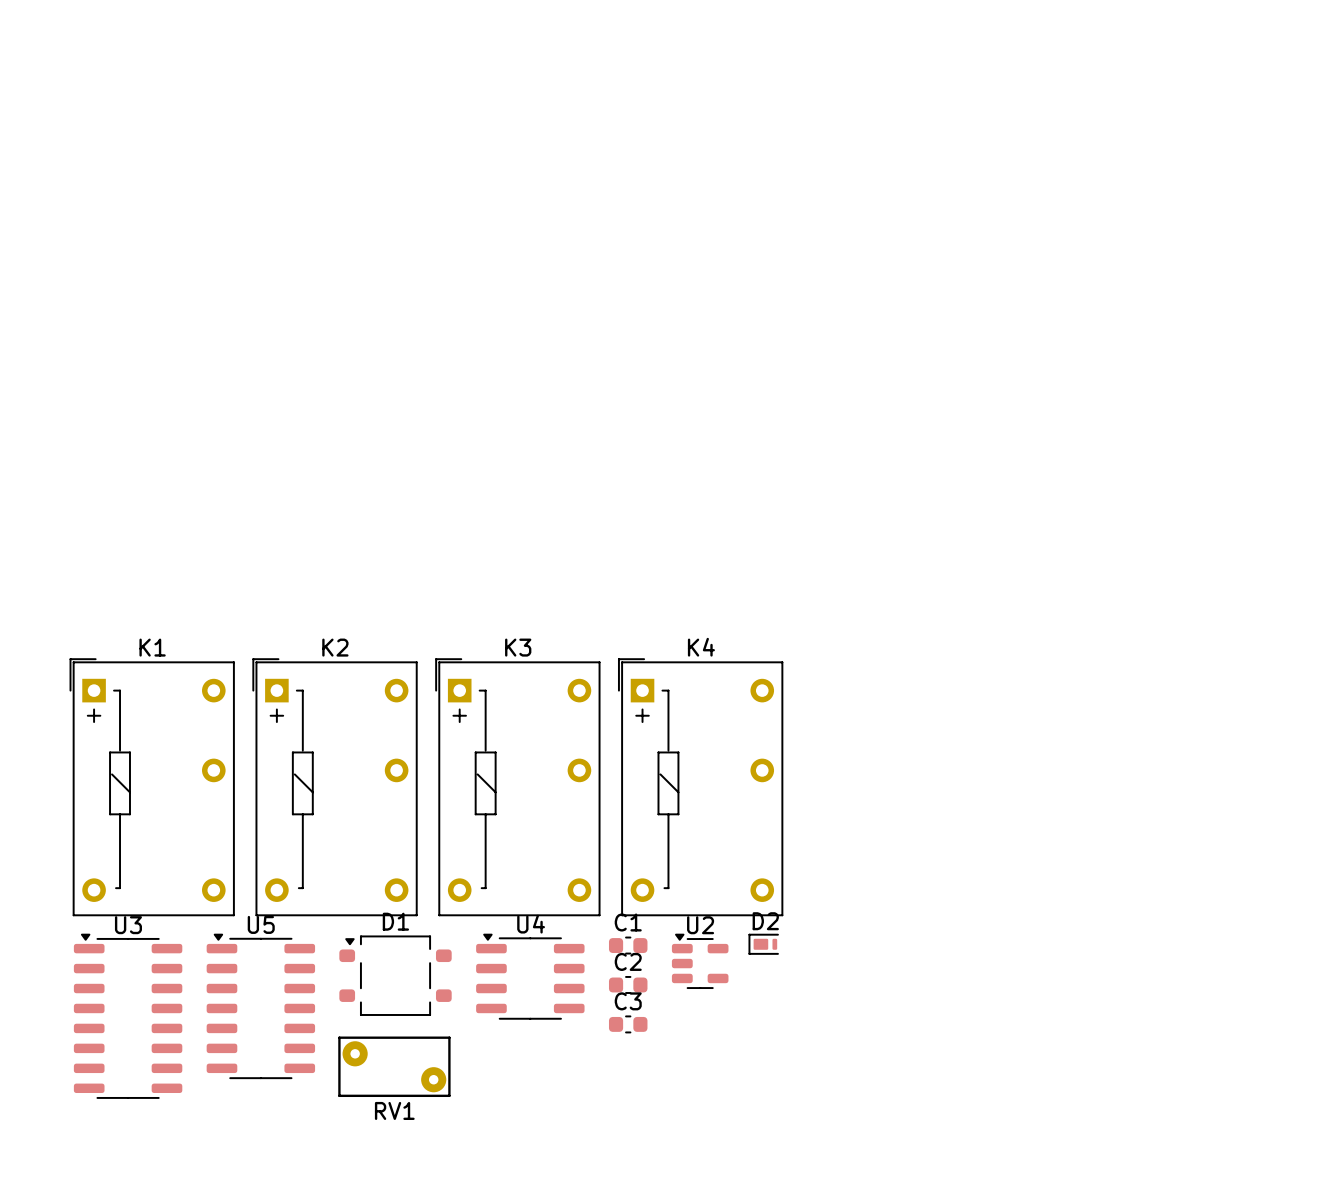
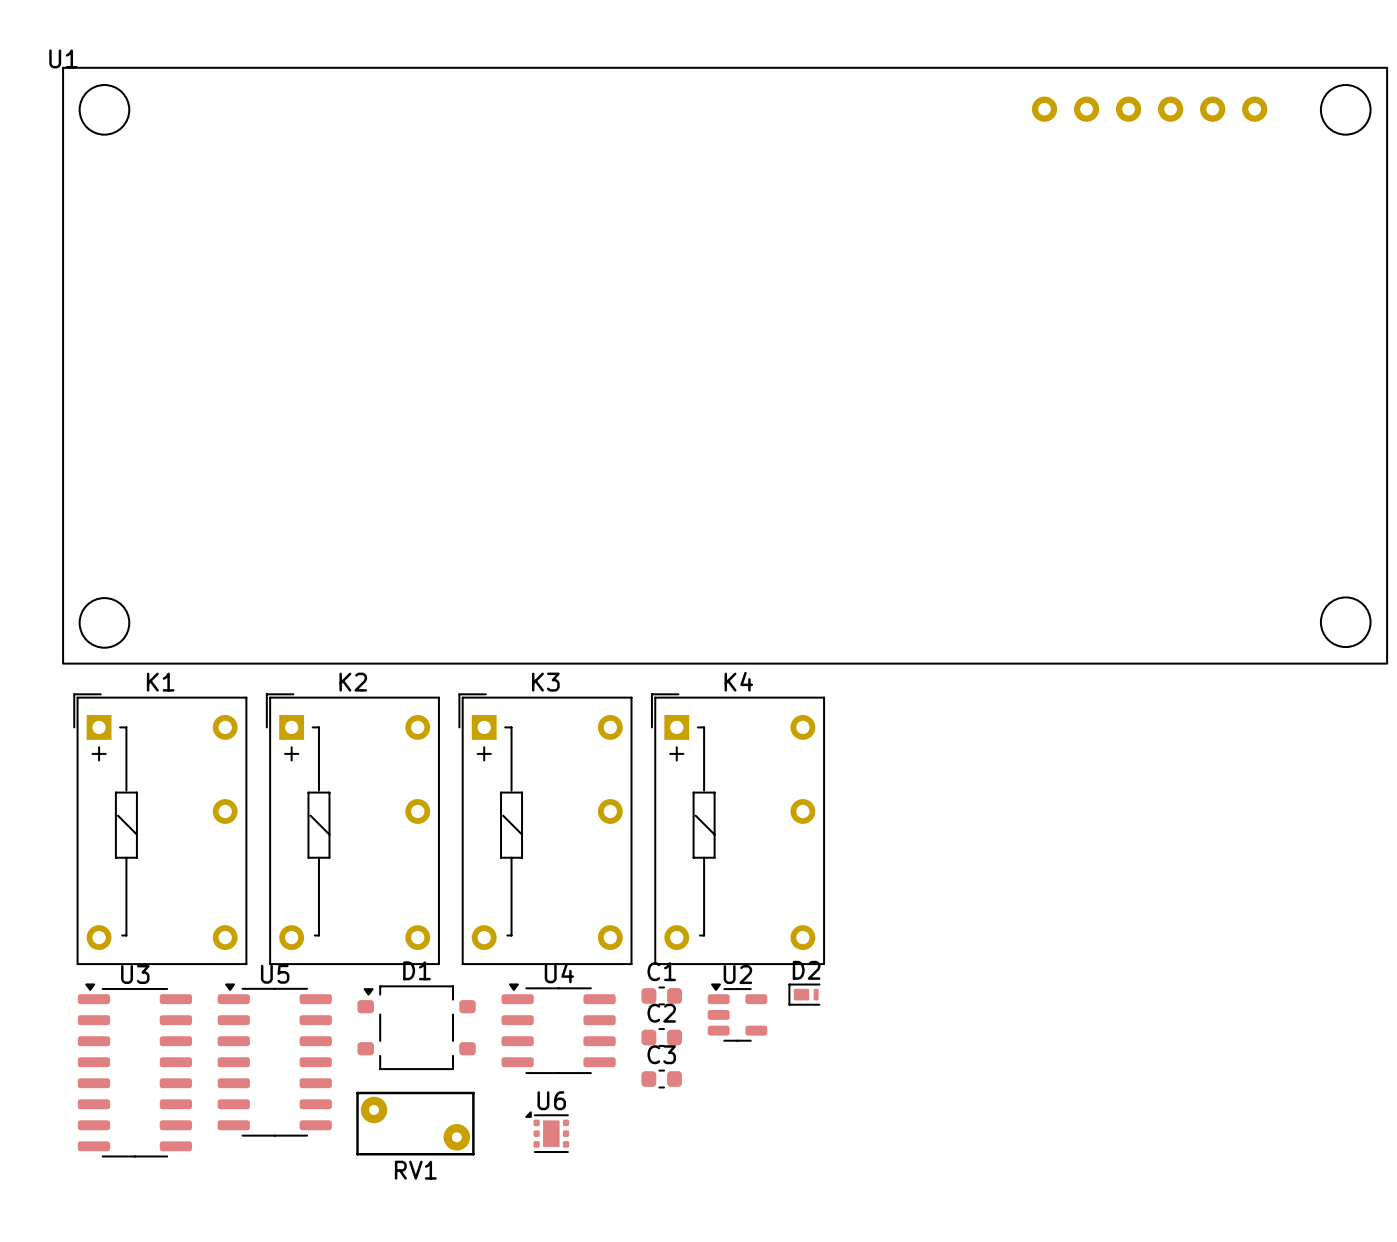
U1: none -> (725, 365)
U6: none -> (547, 1132)

